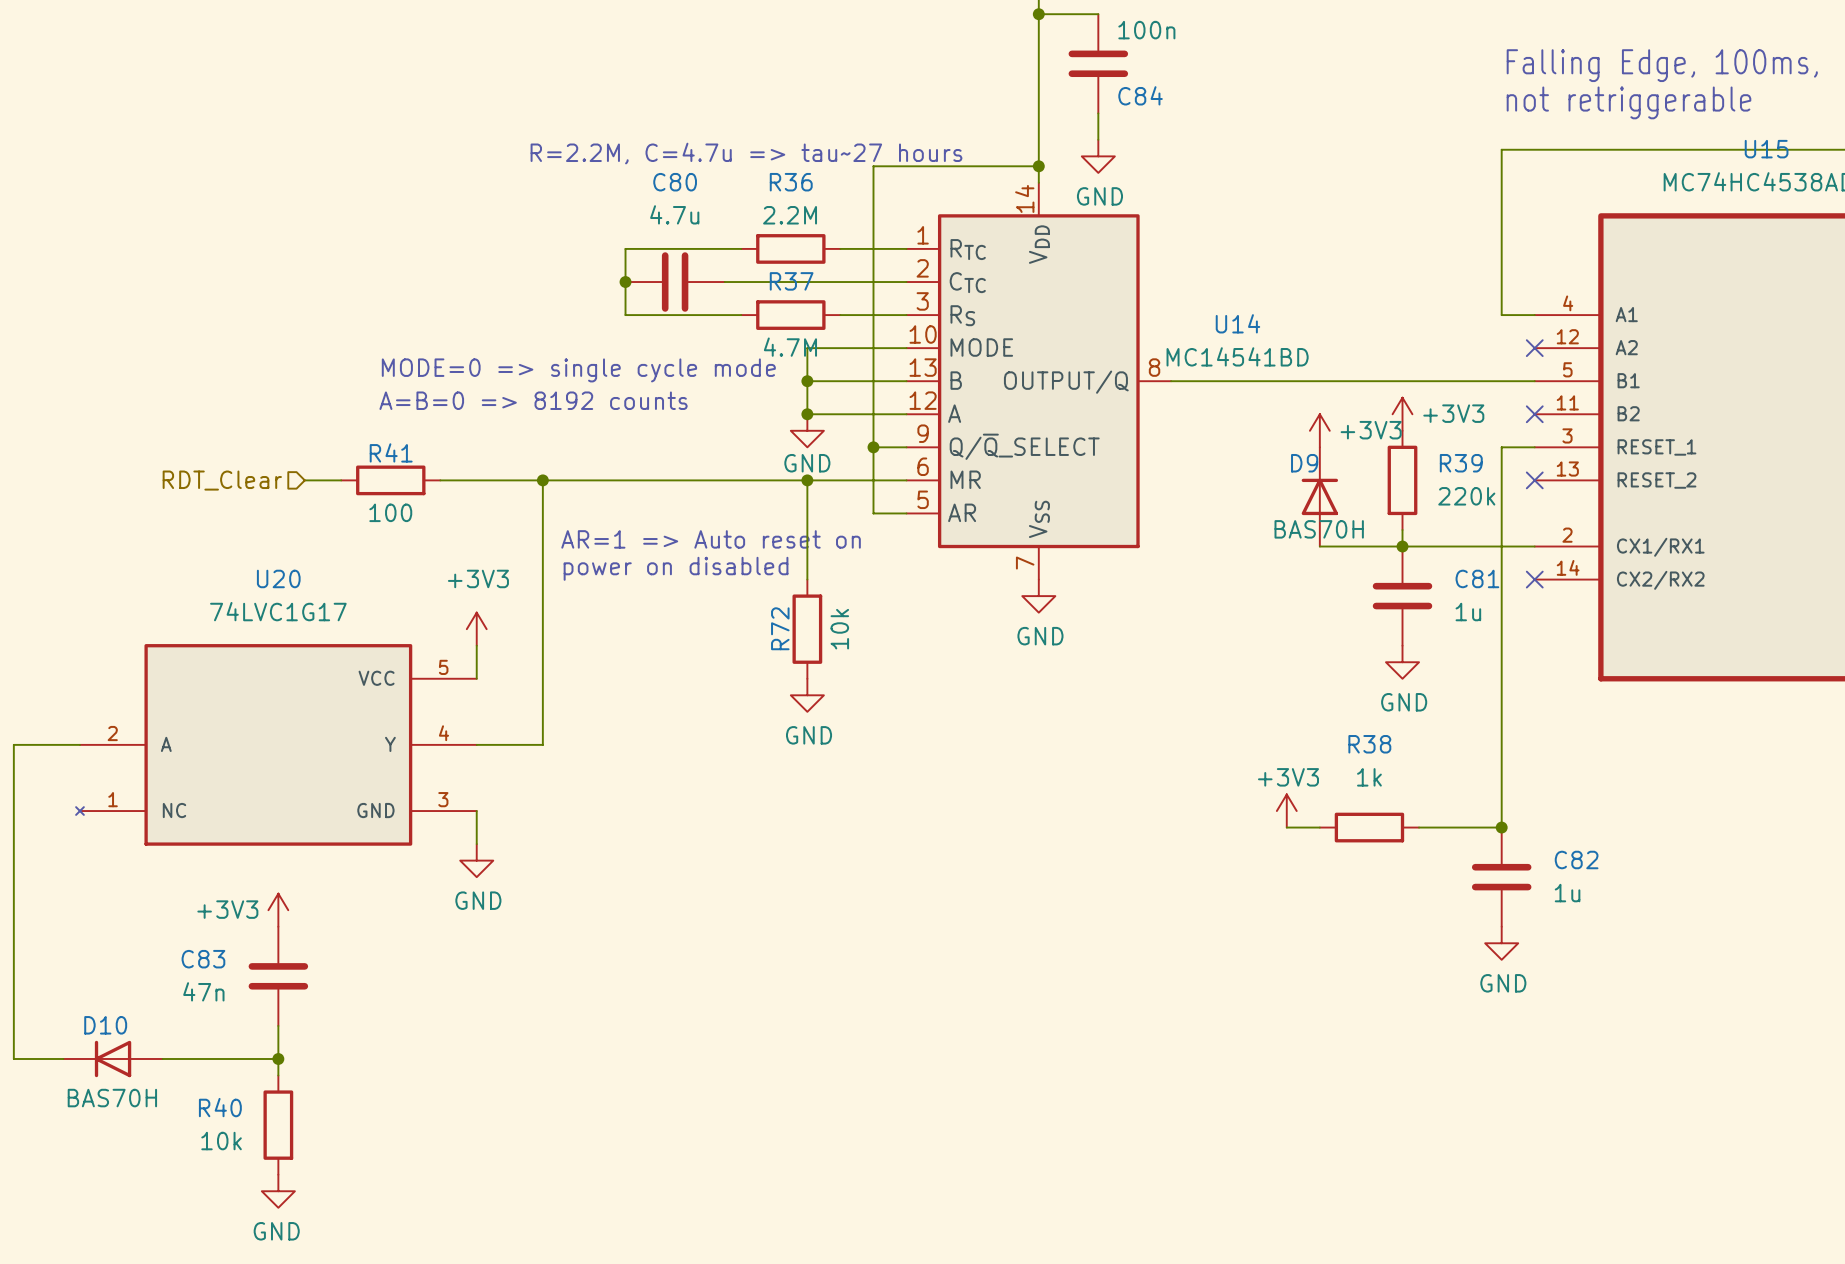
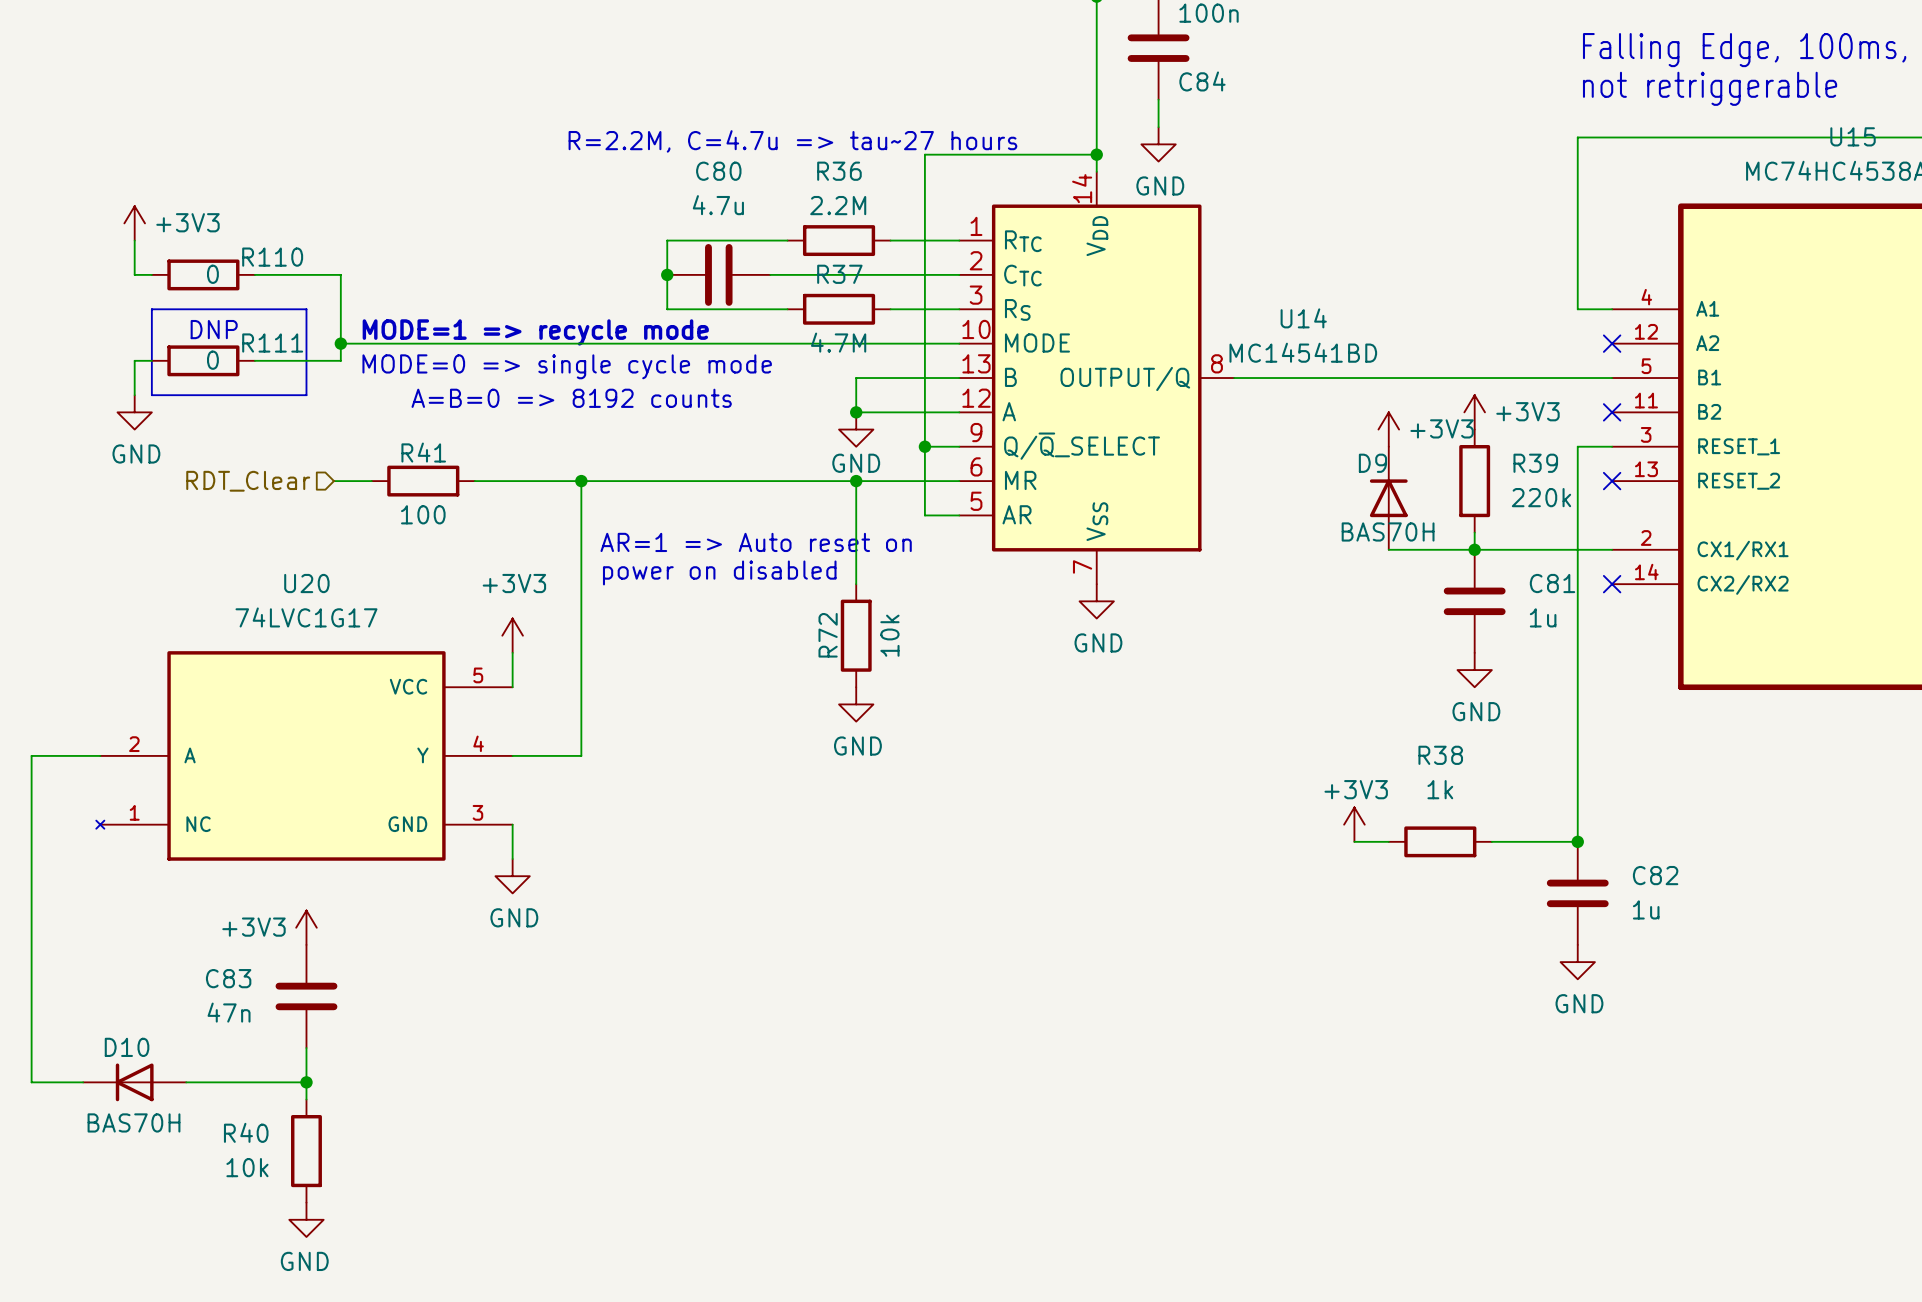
power symbol: none -> +3V3 (134, 223)
wire: none -> (134, 240) (134, 274) (151, 274)
R110: none -> 0 (203, 274)
wire: none -> (254, 274) (340, 274) (340, 360) (254, 360)
line: none -> (151, 309) (151, 395) (306, 395) (306, 309) (151, 309)
text: none -> DNP (214, 329)
text: none -> MODE=1 => recycle mode (535, 332)
junction: none -> (340, 343)
wire: (807, 348) (807, 381) -> (856, 343) (340, 343)
wire: none -> (151, 360) (134, 360) (134, 395)
R111: none -> 0 (203, 360)
text position: MODE=0 => single cycle mode (578, 370) -> MODE=0 => single cycle mode (567, 366)
junction: (807, 381) -> none
power symbol: none -> GND (134, 412)

